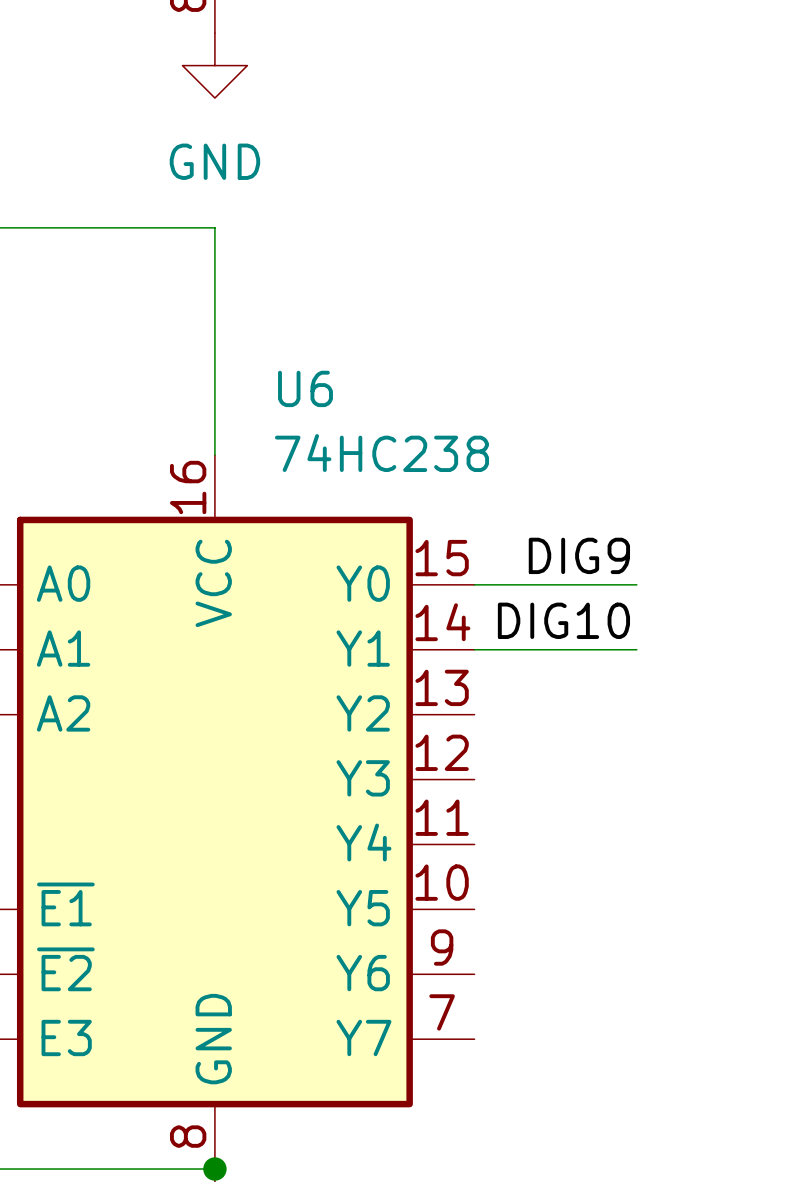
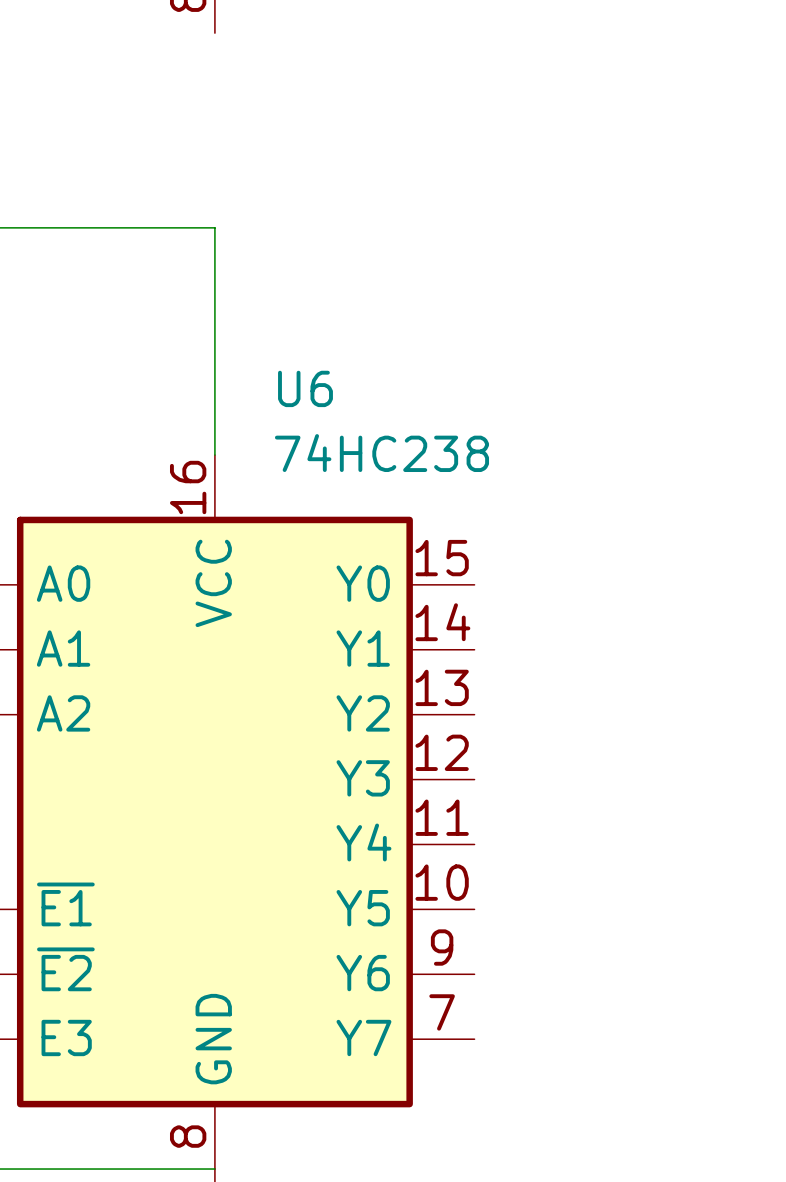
power symbol: GND (214, 65) -> none
label: DIG9 (579, 555) -> none
wire: (474, 584) (636, 584) -> none
label: DIG10 (563, 620) -> none
wire: (474, 649) (636, 649) -> none
junction: (214, 1169) -> none

